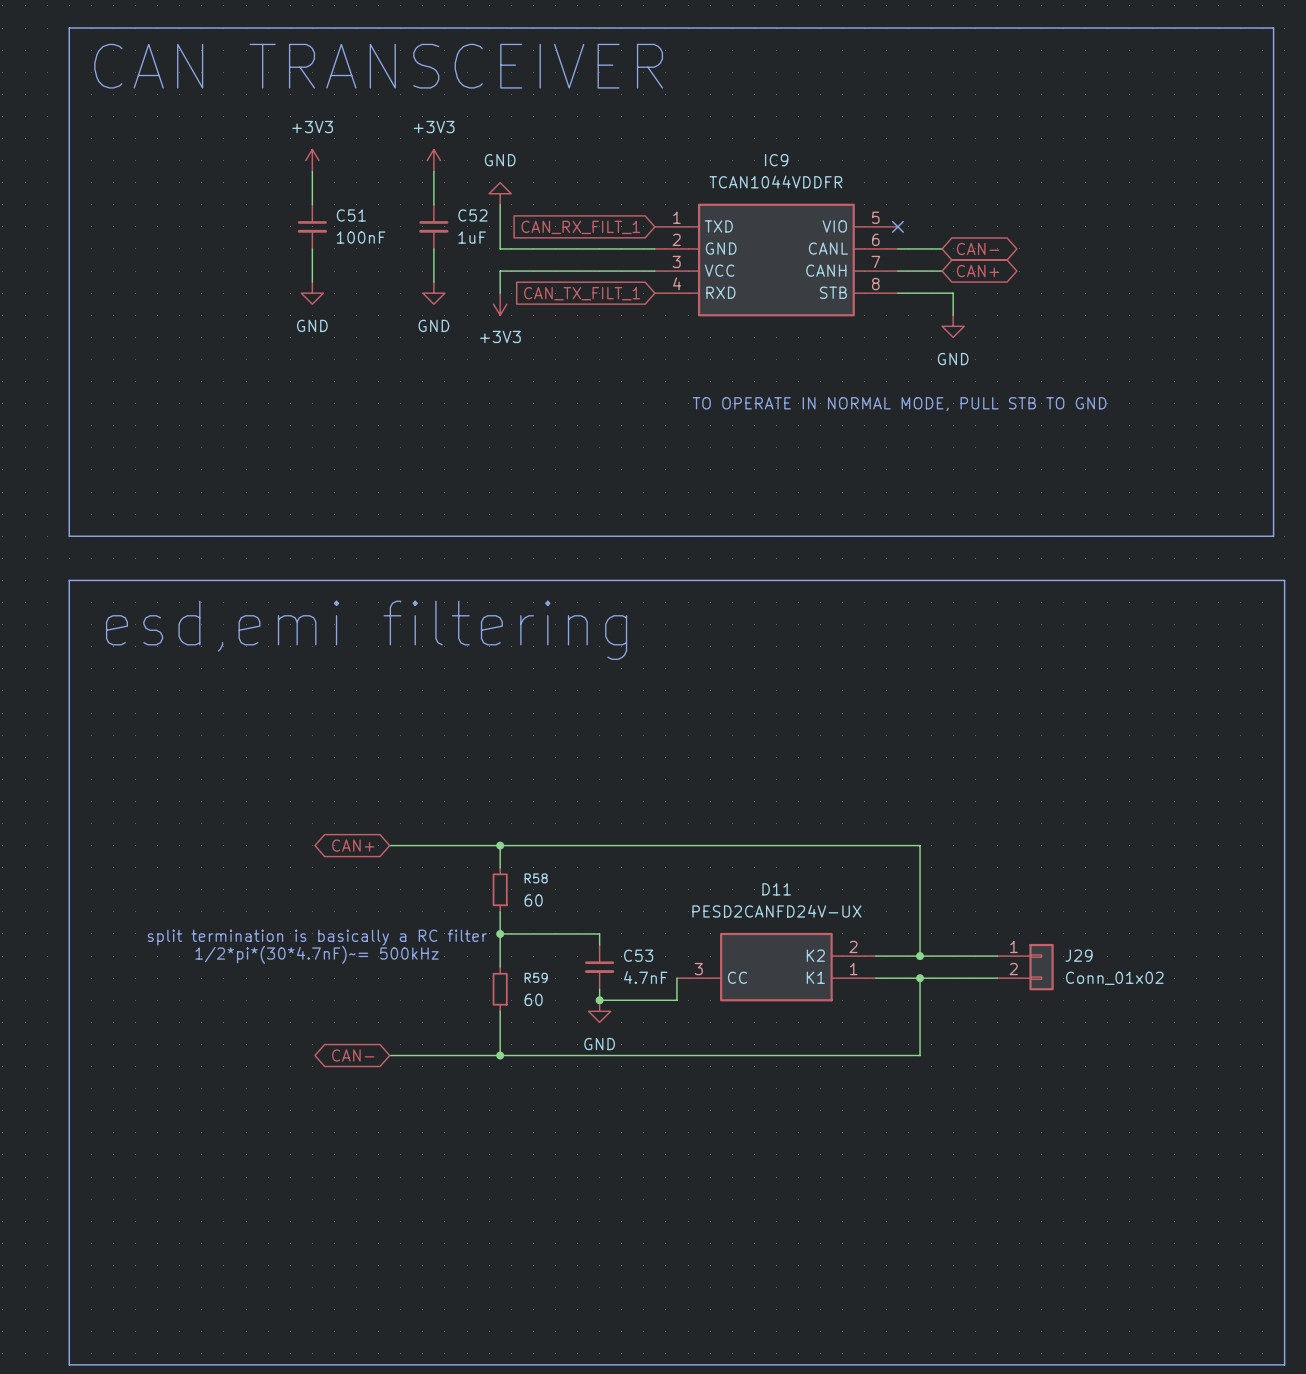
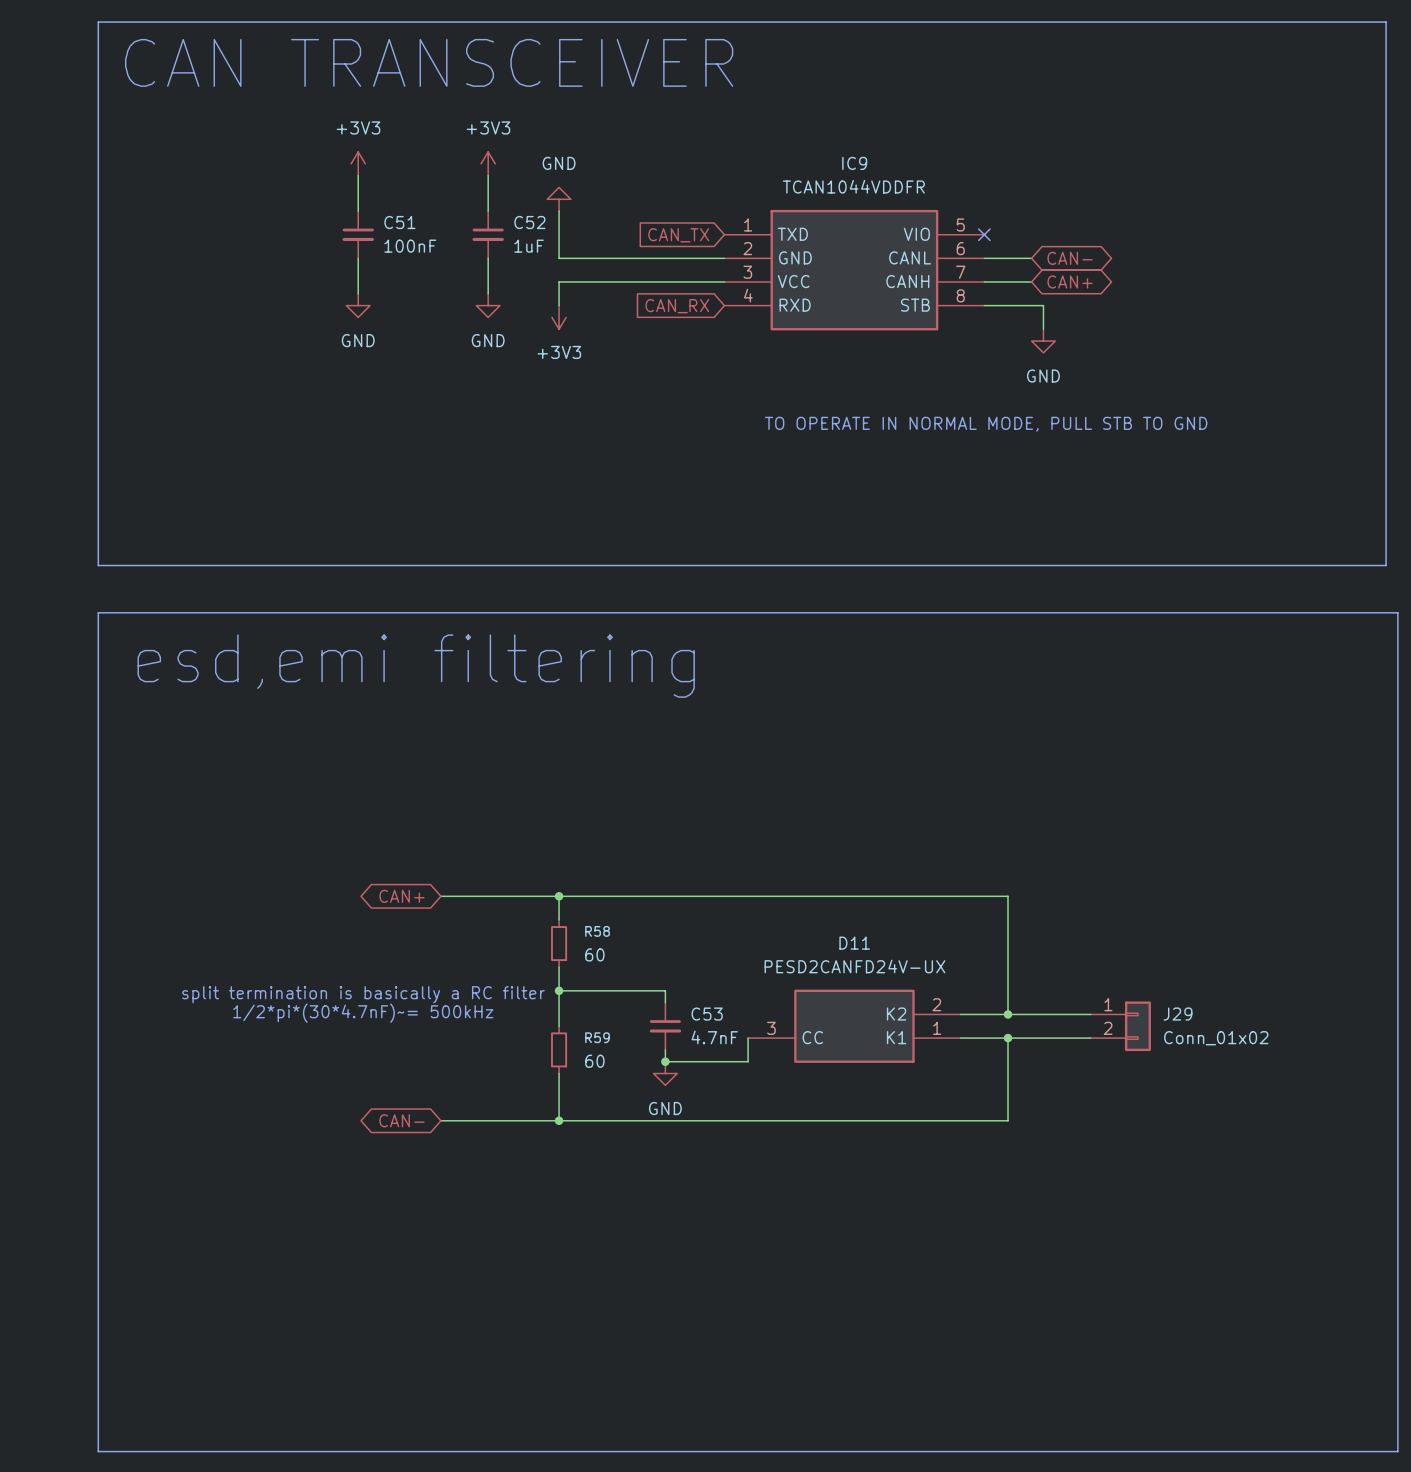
global label: CAN_RX_FILT_1 (580, 227) -> CAN_TX (678, 235)
global label: CAN_TX_FILT_1 (582, 293) -> CAN_RX (677, 306)

